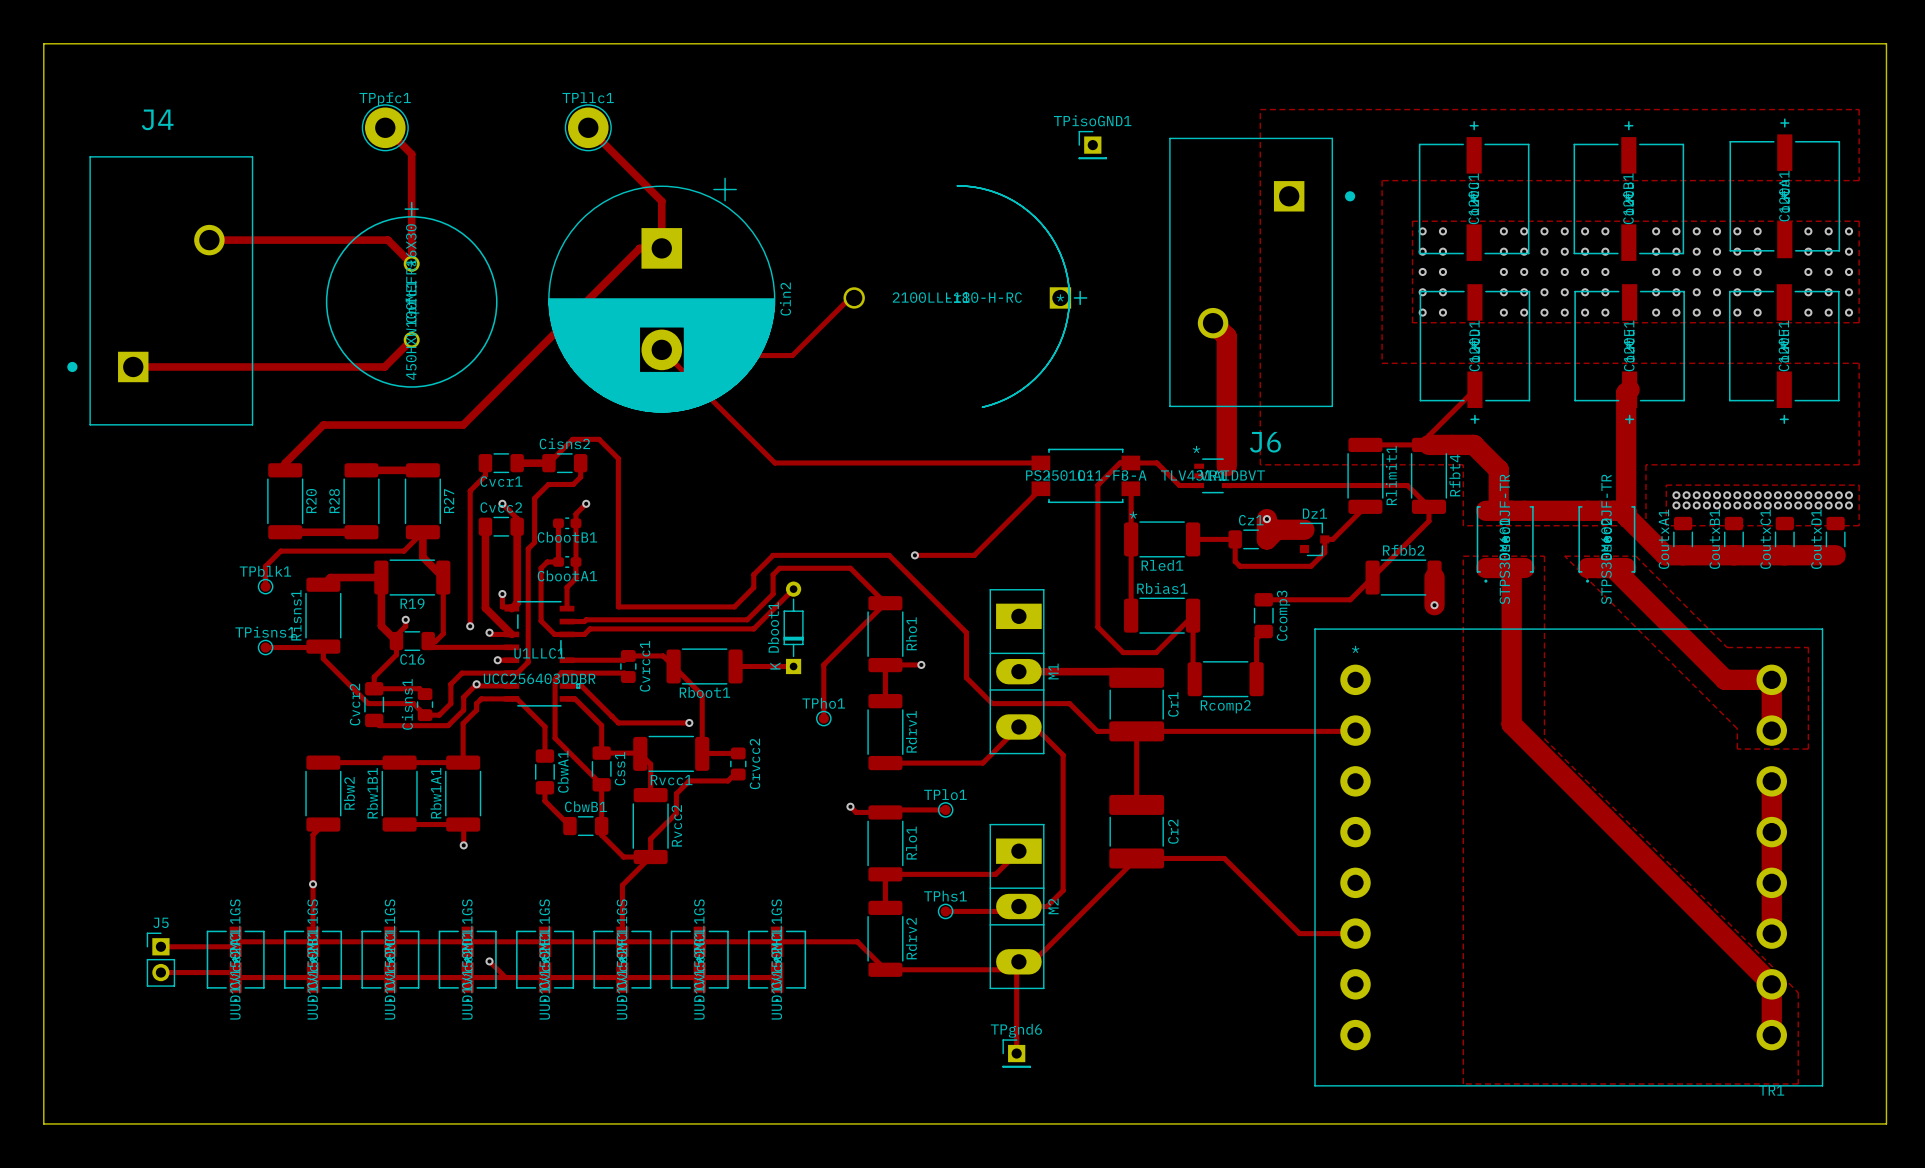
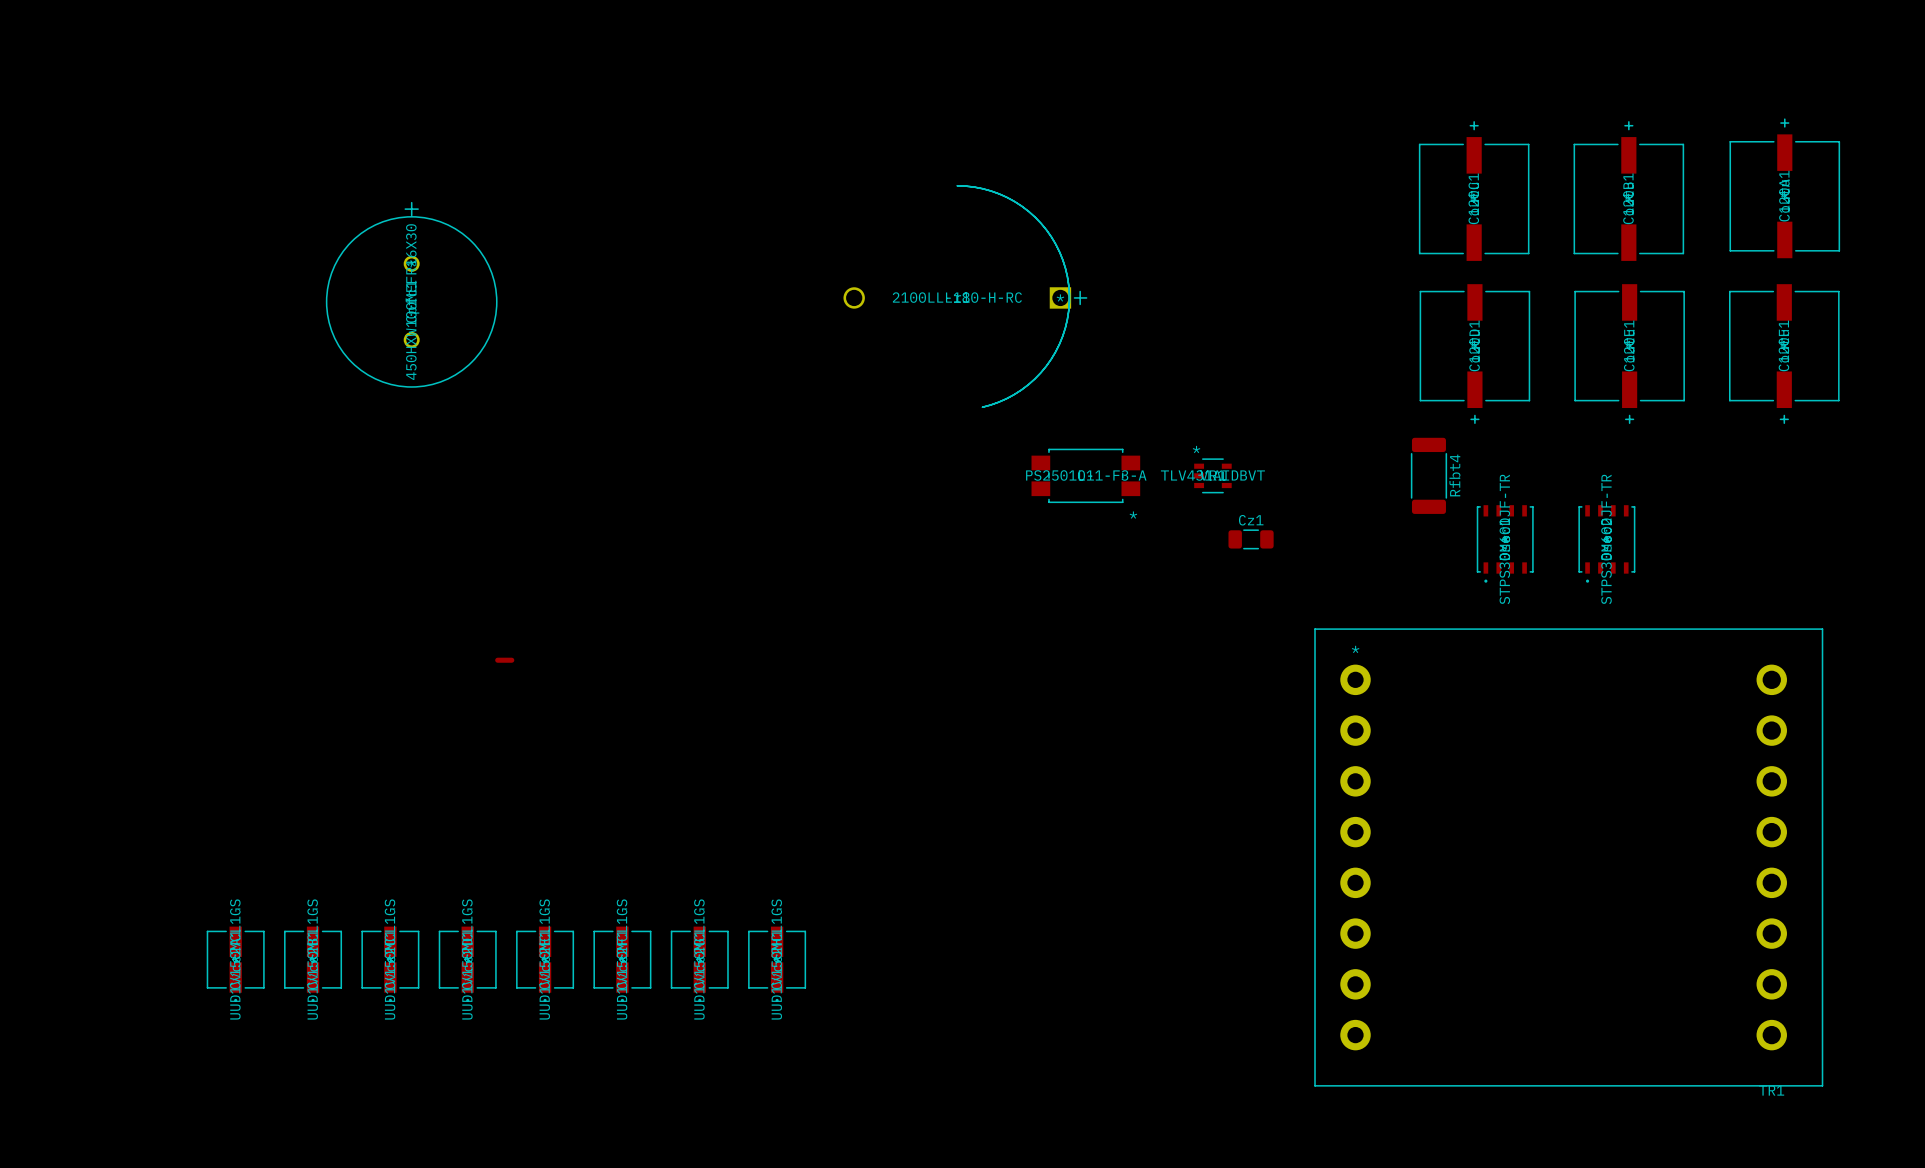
board edge: (43, 43) (1886, 43) (1886, 1123) (43, 1123) (43, 43) -> none
zone outline: (1260, 109) (1260, 464) (1463, 464) (1463, 525) (1645, 525) (1645, 464) (1859, 464) (1859, 363) (1382, 363) (1382, 180) (1859, 180) (1859, 109) (1260, 109) -> none
track: (385, 127) (411, 154) (411, 263) (387, 240) (209, 240) -> none
TPpfc1: (385, 127) -> none
track: (588, 127) (661, 201) (661, 248) (639, 248) (463, 425) (323, 425) (285, 463) (285, 470) -> none
TPllc1: (588, 127) -> none
TPisoGND1: (1092, 145) -> none
zone outline: (1412, 221) (1412, 322) (1859, 322) (1859, 221) (1412, 221) -> none
via: (1422, 231) -> none
via: (1442, 231) -> none
via: (1503, 231) -> none
via: (1524, 231) -> none
via: (1544, 231) -> none
via: (1564, 231) -> none
via: (1585, 231) -> none
via: (1605, 231) -> none
via: (1656, 231) -> none
via: (1676, 231) -> none
via: (1696, 231) -> none
via: (1717, 231) -> none
via: (1737, 231) -> none
via: (1757, 231) -> none
via: (1808, 231) -> none
via: (1828, 231) -> none
via: (1848, 231) -> none
via: (1422, 251) -> none
via: (1442, 251) -> none
via: (1503, 251) -> none
via: (1524, 251) -> none
via: (1544, 251) -> none
via: (1564, 251) -> none
via: (1585, 251) -> none
via: (1605, 251) -> none
via: (1656, 251) -> none
via: (1676, 251) -> none
via: (1696, 251) -> none
via: (1717, 251) -> none
via: (1737, 251) -> none
via: (1757, 251) -> none
via: (1808, 251) -> none
via: (1828, 251) -> none
via: (1848, 251) -> none
via: (1422, 271) -> none
via: (1442, 271) -> none
via: (1503, 271) -> none
via: (1524, 271) -> none
via: (1544, 271) -> none
via: (1564, 271) -> none
via: (1585, 271) -> none
via: (1605, 271) -> none
via: (1656, 271) -> none
via: (1676, 271) -> none
via: (1696, 271) -> none
via: (1717, 271) -> none
via: (1737, 271) -> none
via: (1757, 271) -> none
via: (1808, 271) -> none
via: (1828, 271) -> none
via: (1848, 271) -> none
J6: (1262, 272) -> none
J4: (160, 290) -> none
via: (1422, 292) -> none
via: (1442, 292) -> none
via: (1503, 292) -> none
via: (1524, 292) -> none
via: (1544, 292) -> none
via: (1564, 292) -> none
via: (1585, 292) -> none
via: (1605, 292) -> none
via: (1656, 292) -> none
via: (1676, 292) -> none
via: (1696, 292) -> none
via: (1717, 292) -> none
via: (1737, 292) -> none
via: (1757, 292) -> none
via: (1808, 292) -> none
via: (1828, 292) -> none
via: (1848, 292) -> none
Cin2: (661, 295) -> none
track: (854, 297) (850, 297) (792, 355) (734, 355) -> none
via: (1422, 312) -> none
via: (1442, 312) -> none
via: (1503, 312) -> none
via: (1524, 312) -> none
via: (1544, 312) -> none
via: (1564, 312) -> none
via: (1585, 312) -> none
via: (1605, 312) -> none
via: (1656, 312) -> none
via: (1676, 312) -> none
via: (1696, 312) -> none
via: (1717, 312) -> none
via: (1737, 312) -> none
via: (1757, 312) -> none
via: (1808, 312) -> none
via: (1828, 312) -> none
via: (1848, 312) -> none
track: (1213, 323) (1226, 336) (1226, 466) -> none
track: (411, 339) (384, 366) (133, 366) -> none
track: (651, 339) (774, 462) (1040, 462) -> none
track: (1474, 389) (1428, 435) (1428, 444) -> none
track: (1629, 389) (1626, 393) (1626, 516) (1665, 555) (1835, 555) -> none
track: (1365, 444) (1428, 444) -> none
track: (1428, 444) (1473, 444) (1498, 469) (1498, 510) -> none
track: (485, 463) (485, 475) (470, 490) (470, 626) -> none
Cvcr1: (501, 463) -> none
track: (517, 463) (548, 463) (572, 439) (599, 439) (618, 458) (618, 606) (734, 606) (753, 587) (753, 574) (773, 555) (889, 555) (966, 632) (966, 677) (992, 703) (1069, 703) (1097, 731) (1355, 730) -> none
Cisns2: (564, 463) -> none
track: (580, 463) (580, 477) (573, 484) (548, 484) (534, 498) (534, 542) (528, 548) (528, 662) (517, 673) (462, 673) (450, 684) (450, 703) (439, 715) (425, 715) (413, 703) (368, 703) (323, 658) (323, 646) (265, 647) -> none
track: (361, 470) (422, 470) -> none
Rlimit1: (1365, 475) -> none
track: (1199, 485) (1179, 485) (1156, 462) (1120, 462) (1097, 485) (1097, 627) (1123, 652) (1156, 652) (1193, 615) (1193, 677) (1194, 679) -> none
track: (1226, 485) (1407, 485) (1428, 506) (1428, 521) (1350, 599) (1263, 599) -> none
zone outline: (1666, 485) (1666, 525) (1859, 525) (1859, 485) (1666, 485) -> none
track: (1040, 488) (974, 555) (914, 555) -> none
track: (1130, 488) (1131, 615) -> none
via: (1676, 495) -> none
via: (1686, 495) -> none
via: (1696, 495) -> none
via: (1706, 495) -> none
via: (1717, 495) -> none
via: (1727, 495) -> none
via: (1737, 495) -> none
via: (1747, 495) -> none
via: (1757, 495) -> none
via: (1767, 495) -> none
via: (1777, 495) -> none
via: (1788, 495) -> none
via: (1798, 495) -> none
via: (1808, 495) -> none
via: (1818, 495) -> none
via: (1828, 495) -> none
via: (1838, 495) -> none
via: (1848, 495) -> none
R20: (285, 501) -> none
R28: (361, 501) -> none
R27: (422, 501) -> none
track: (502, 503) (517, 518) (517, 603) (511, 608) (502, 606) (502, 594) -> none
via: (502, 503) -> none
track: (586, 503) (575, 514) (575, 578) (567, 587) (567, 608) -> none
via: (586, 503) -> none
via: (1676, 505) -> none
via: (1686, 505) -> none
via: (1696, 505) -> none
via: (1706, 505) -> none
via: (1717, 505) -> none
via: (1727, 505) -> none
via: (1737, 505) -> none
via: (1747, 505) -> none
via: (1757, 505) -> none
via: (1767, 505) -> none
via: (1777, 505) -> none
via: (1788, 505) -> none
via: (1798, 505) -> none
via: (1808, 505) -> none
via: (1818, 505) -> none
via: (1828, 505) -> none
via: (1838, 505) -> none
via: (1848, 505) -> none
track: (1365, 506) (1332, 539) (1324, 539) (1324, 552) (1311, 566) (1239, 566) (1235, 561) (1235, 539) (1193, 539) -> none
track: (1485, 510) (1626, 510) -> none
track: (1266, 519) (1266, 539) (1276, 529) (1304, 529) -> none
via: (1266, 519) -> none
track: (558, 523) (558, 561) (547, 561) (541, 568) (541, 620) (554, 634) (584, 634) (589, 628) (753, 628) (793, 589) -> none
CbootB1: (567, 523) -> none
track: (485, 526) (485, 608) (511, 634) (491, 634) (489, 632) -> none
Cvcc2: (501, 526) -> none
track: (285, 532) (361, 532) -> none
Rled1: (1162, 539) -> none
Dz1: (1314, 539) -> none
CoutxA1: (1683, 539) -> none
CoutxB1: (1733, 539) -> none
CoutxC1: (1784, 539) -> none
CoutxD1: (1835, 539) -> none
via: (914, 555) -> none
zone outline: (1463, 556) (1463, 1083) (1798, 1083) (1798, 992) (1544, 738) (1544, 556) (1463, 556) -> none
zone outline: (1564, 556) (1635, 556) (1727, 647) (1808, 647) (1808, 749) (1737, 749) (1737, 728) (1564, 556) -> none
CbootA1: (567, 561) -> none
track: (1485, 568) (1524, 568) -> none
track: (1511, 568) (1511, 724) (1771, 984) (1771, 1035) -> none
track: (1587, 568) (1626, 568) -> none
track: (1613, 568) (1725, 679) (1771, 679) (1771, 730) -> none
R19: (412, 577) -> none
Rfbb2: (1403, 577) -> none
track: (1434, 577) (1434, 605) -> none
track: (323, 584) (330, 577) (381, 577) (381, 625) (396, 641) -> none
track: (265, 586) (265, 566) (280, 551) (404, 551) (422, 532) (422, 557) (443, 577) (443, 633) (436, 641) (428, 641) (434, 647) (511, 647) -> none
TPblk1: (265, 586) -> none
via: (502, 594) -> none
via: (1434, 605) -> none
Risns1: (323, 615) -> none
Rbias1: (1162, 615) -> none
Ccomp3: (1263, 615) -> none
track: (405, 619) (405, 626) (396, 635) (396, 654) (374, 677) (374, 688) (419, 688) (425, 694) -> none
via: (405, 619) -> none
track: (567, 621) (584, 621) (586, 619) (747, 619) (773, 594) (773, 574) (779, 568) (850, 568) (885, 603) (823, 664) (823, 718) -> none
via: (470, 626) -> none
Dboot1: (793, 627) -> none
track: (1263, 631) (1256, 638) (1256, 679) -> none
via: (489, 632) -> none
Rho1: (885, 634) -> none
C16: (412, 641) -> none
TPisns1: (265, 647) -> none
U1LLC1: UCC256403DDBR (542, 653) -> none
via: (497, 660) -> none
track: (567, 660) (624, 660) (628, 655) (663, 655) (702, 695) (702, 753) (738, 753) -> none
track: (921, 664) (885, 665) (885, 701) -> none
via: (921, 664) -> none
Cvrcc1: (628, 666) -> none
Rboot1: (704, 666) -> none
track: (735, 666) (793, 666) -> none
M1: (1017, 671) -> none
track: (1018, 671) (1130, 671) (1136, 677) -> none
track: (628, 677) (624, 673) (561, 673) (555, 679) (555, 738) (601, 784) (601, 835) (623, 857) (650, 857) -> none
Rcomp2: (1225, 679) -> none
via: (476, 684) -> none
track: (511, 686) (474, 686) (463, 697) (463, 710) (448, 725) (379, 725) (374, 720) -> none
track: (567, 686) (581, 686) (618, 722) (689, 722) -> none
track: (567, 698) (575, 698) (601, 725) (601, 753) -> none
Cvcr2: (374, 704) -> none
Cisns1: (425, 704) -> none
Cr1: (1136, 704) -> none
TPho1: (823, 718) -> none
via: (689, 722) -> none
track: (1136, 731) (1136, 804) -> none
Rdrv1: (885, 732) -> none
track: (597, 753) (639, 753) (650, 764) (650, 795) -> none
Rvcc1: (671, 753) -> none
track: (544, 756) (544, 726) (517, 698) (481, 698) (476, 703) (476, 710) (463, 723) (463, 762) (323, 762) -> none
Crvcc2: (738, 763) -> none
track: (885, 763) (982, 763) (1018, 726) (1034, 726) (1063, 755) (1063, 890) (1047, 906) (1018, 906) (1013, 911) (945, 911) -> none
Css1: (601, 768) -> none
CbwA1: (544, 771) -> none
track: (738, 774) (733, 775) (728, 780) (689, 780) (676, 793) (676, 813) (650, 838) (650, 857) -> none
track: (1771, 781) (1771, 933) -> none
track: (544, 787) (544, 801) (569, 826) -> none
Rbw2: (323, 793) -> none
Rbw1B1: (399, 793) -> none
Rbw1A1: (463, 793) -> none
track: (850, 806) (856, 812) (885, 812) (887, 809) (945, 809) -> none
via: (850, 806) -> none
TPlo1: (945, 809) -> none
track: (323, 824) (313, 834) (313, 941) -> none
track: (399, 824) (463, 824) (463, 845) -> none
CbwB1: (585, 826) -> none
Rvcc2: (650, 826) -> none
Cr2: (1136, 831) -> none
Rlo1: (885, 843) -> none
via: (463, 845) -> none
track: (1018, 851) (995, 874) (885, 874) (885, 907) -> none
track: (650, 857) (622, 885) (622, 941) -> none
via: (313, 884) -> none
M2: (1017, 906) -> none
TPhs1: (945, 911) -> none
track: (1355, 933) (1299, 933) (1224, 858) (1136, 858) (1033, 961) (1018, 961) (1010, 969) (885, 969) (857, 941) (235, 941) (230, 946) (160, 946) -> none
Rdrv2: (885, 938) -> none
J5: (160, 959) -> none
track: (489, 961) (505, 977) -> none
via: (489, 961) -> none
track: (1016, 964) (1016, 1053) -> none
track: (160, 972) (230, 972) (235, 977) (777, 977) -> none
TPgnd6: (1016, 1053) -> none

